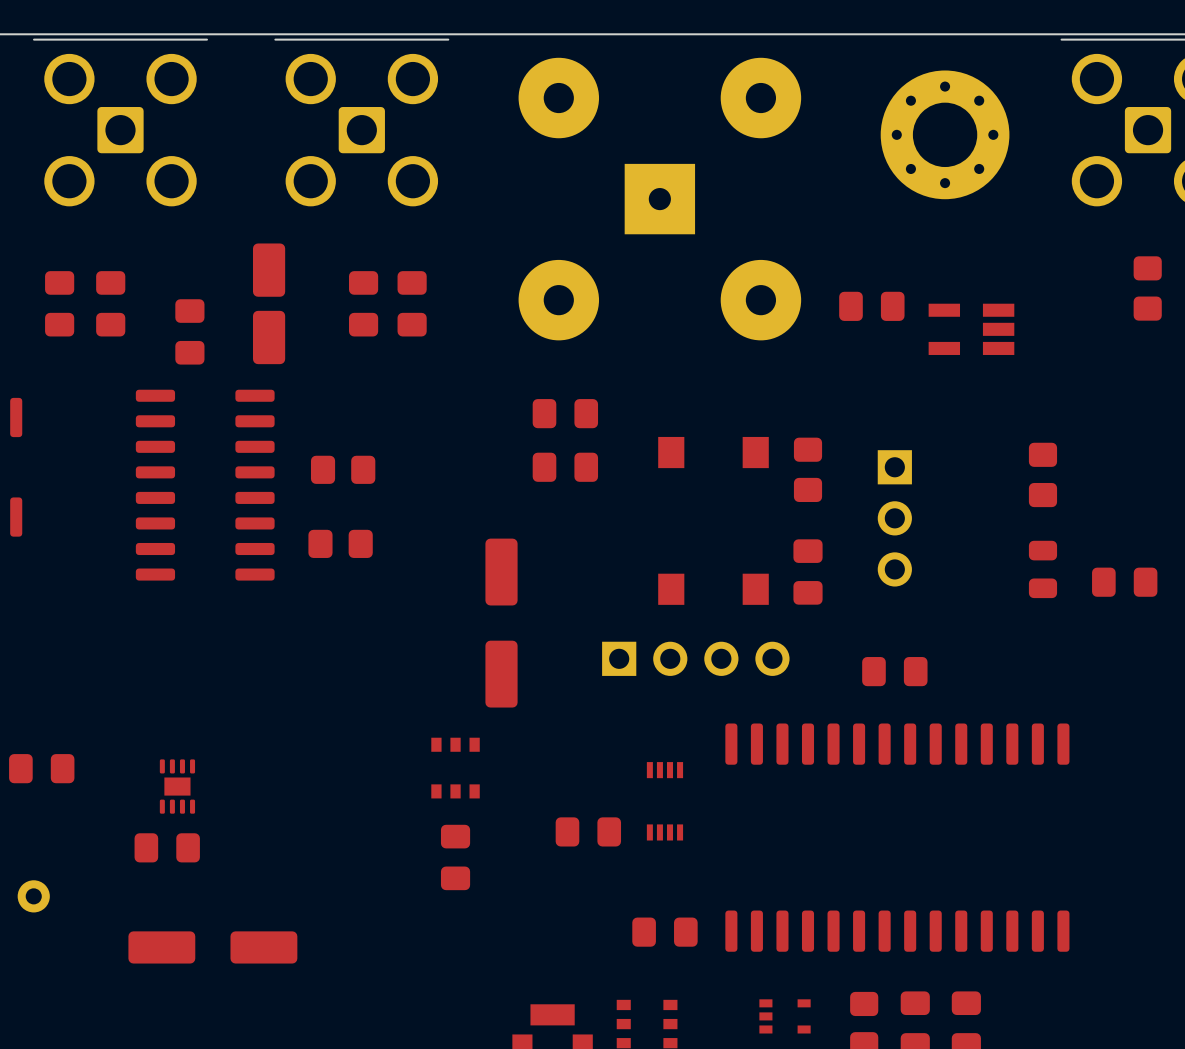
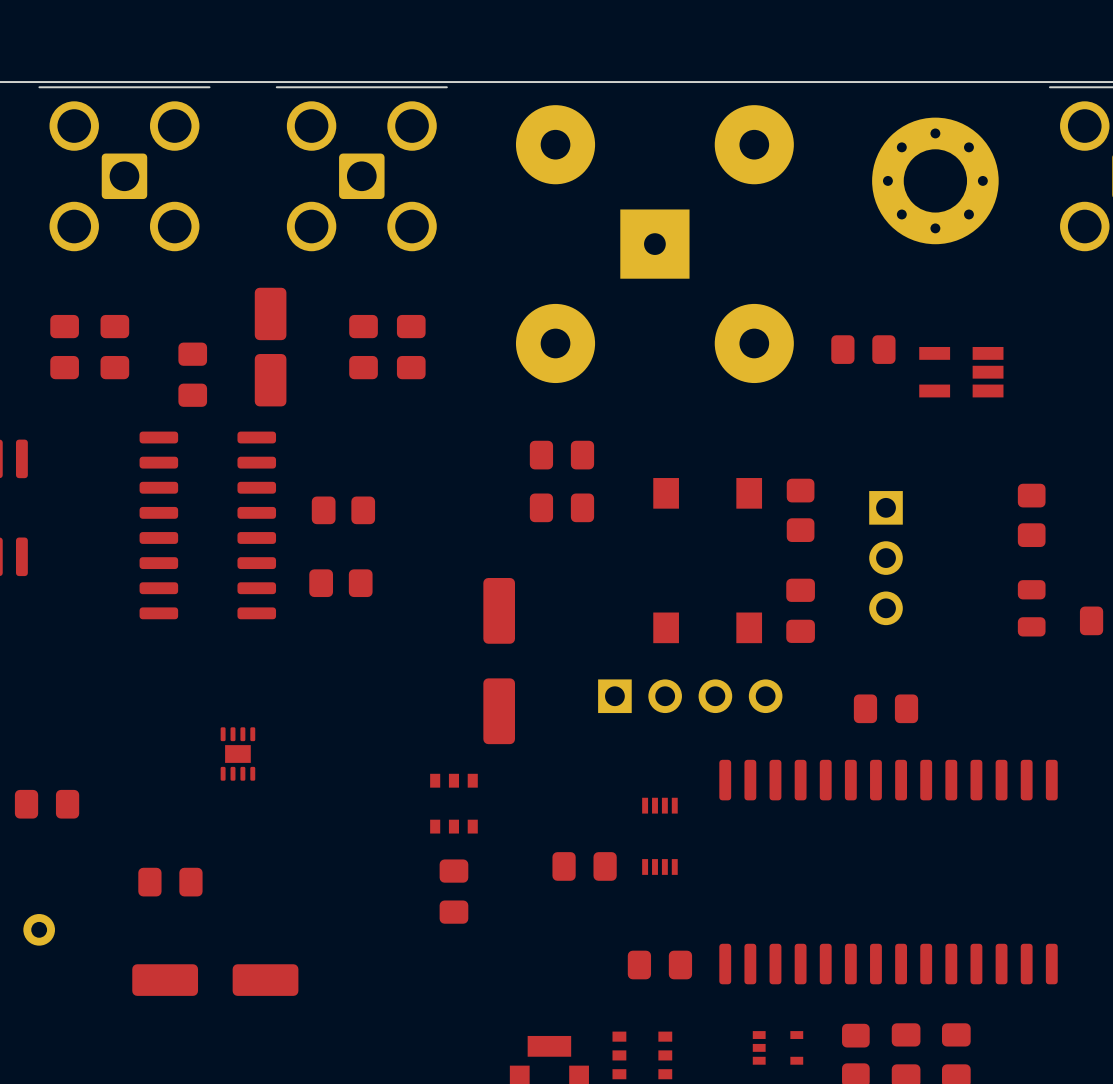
part position: (177, 786) -> (237, 754)

